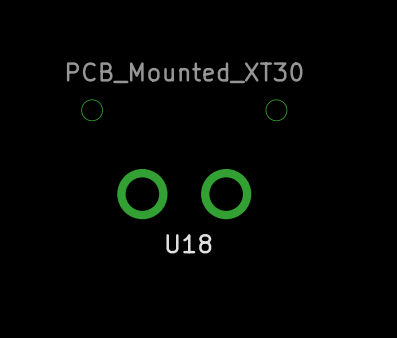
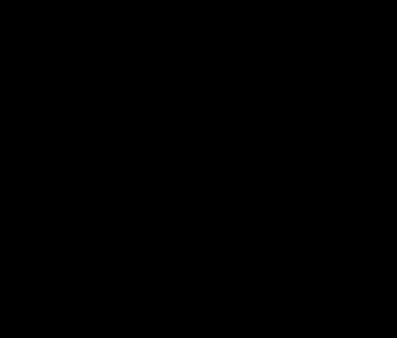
U18: PCB_Mounted_XT30 (184, 159) -> none

